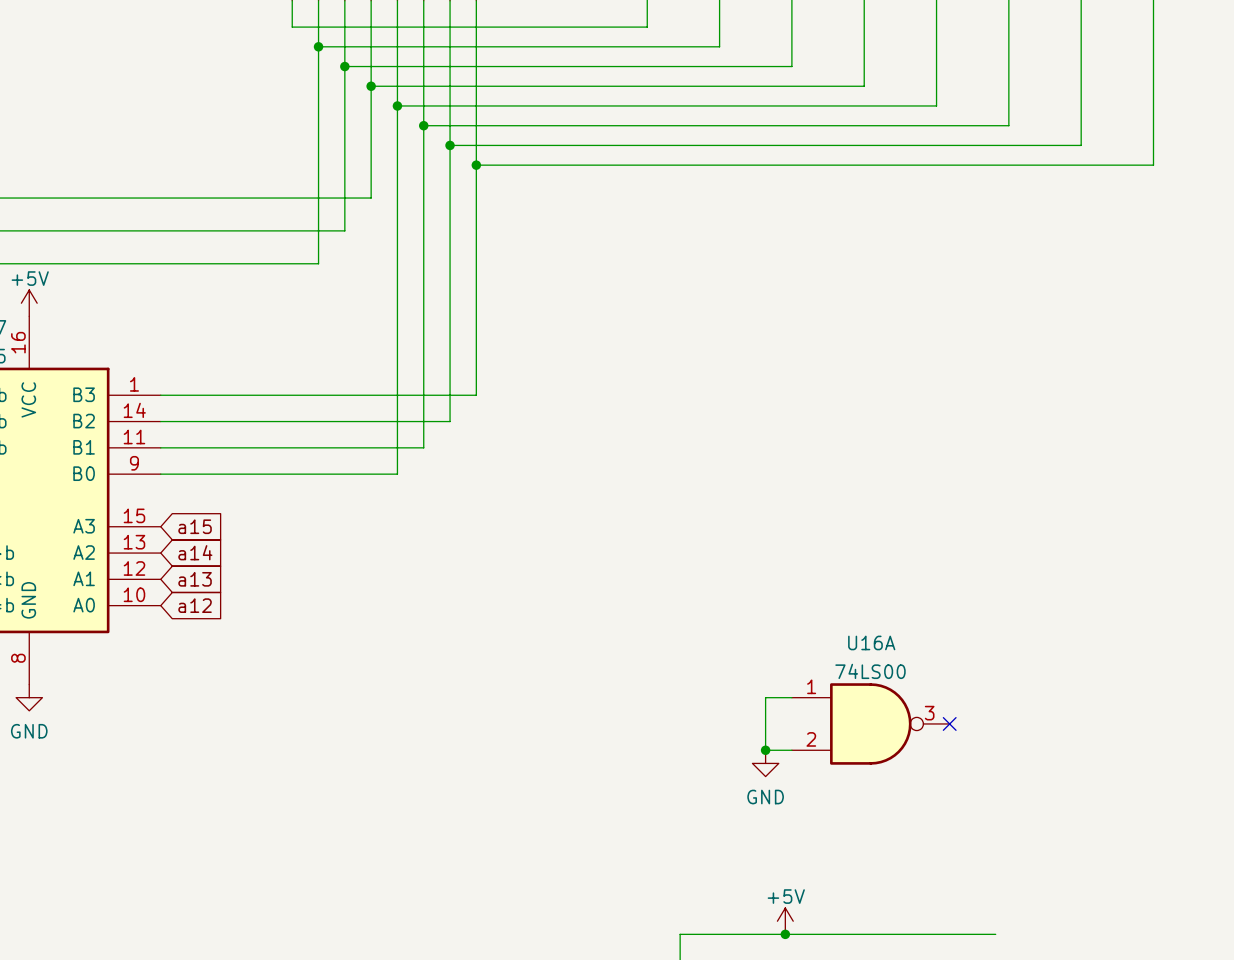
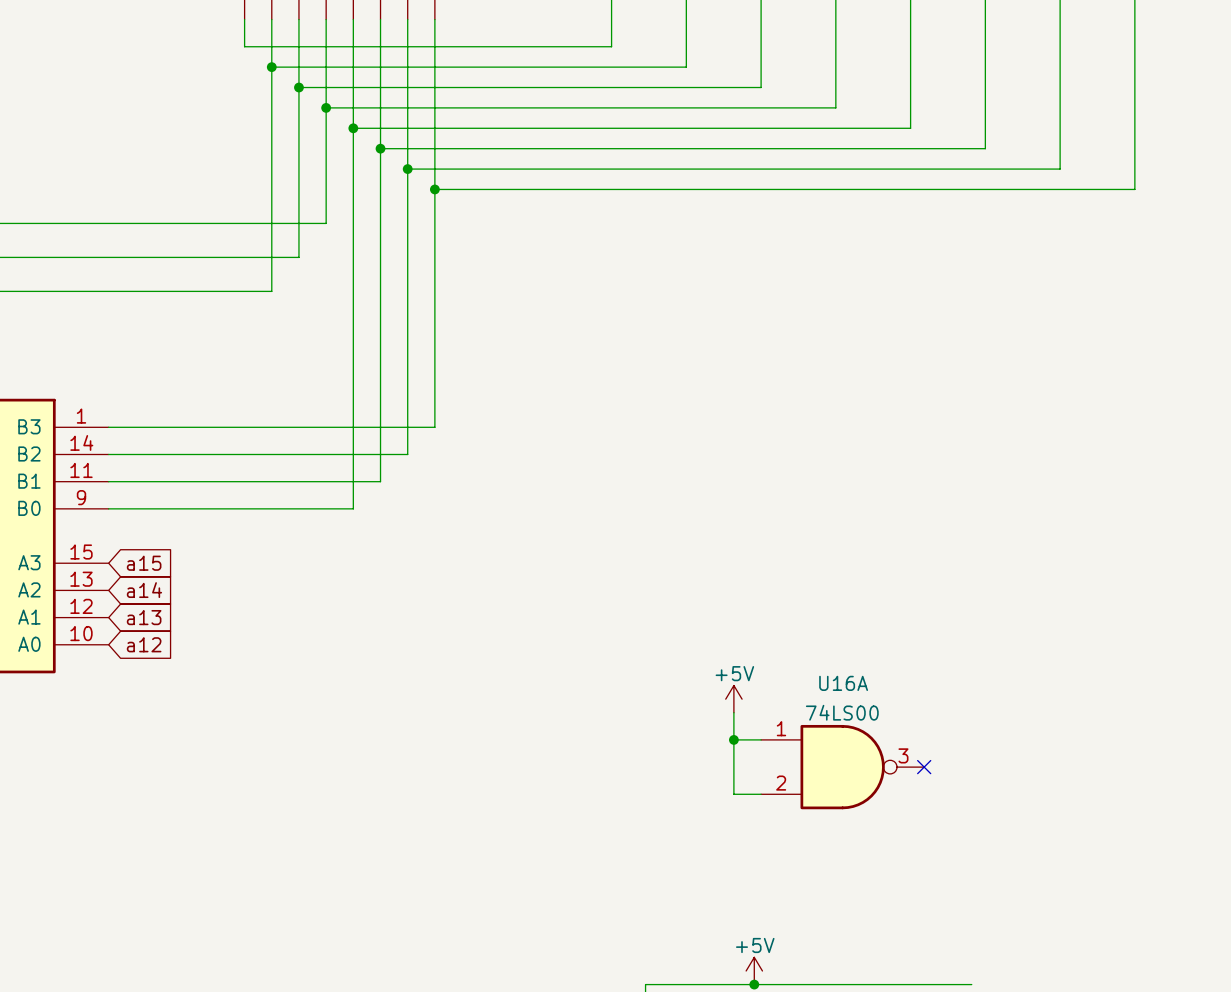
power symbol: none -> +5V (733, 699)
wire: none -> (733, 712) (733, 739)
junction position: (765, 750) -> (733, 739)
power symbol: GND (765, 763) -> none

